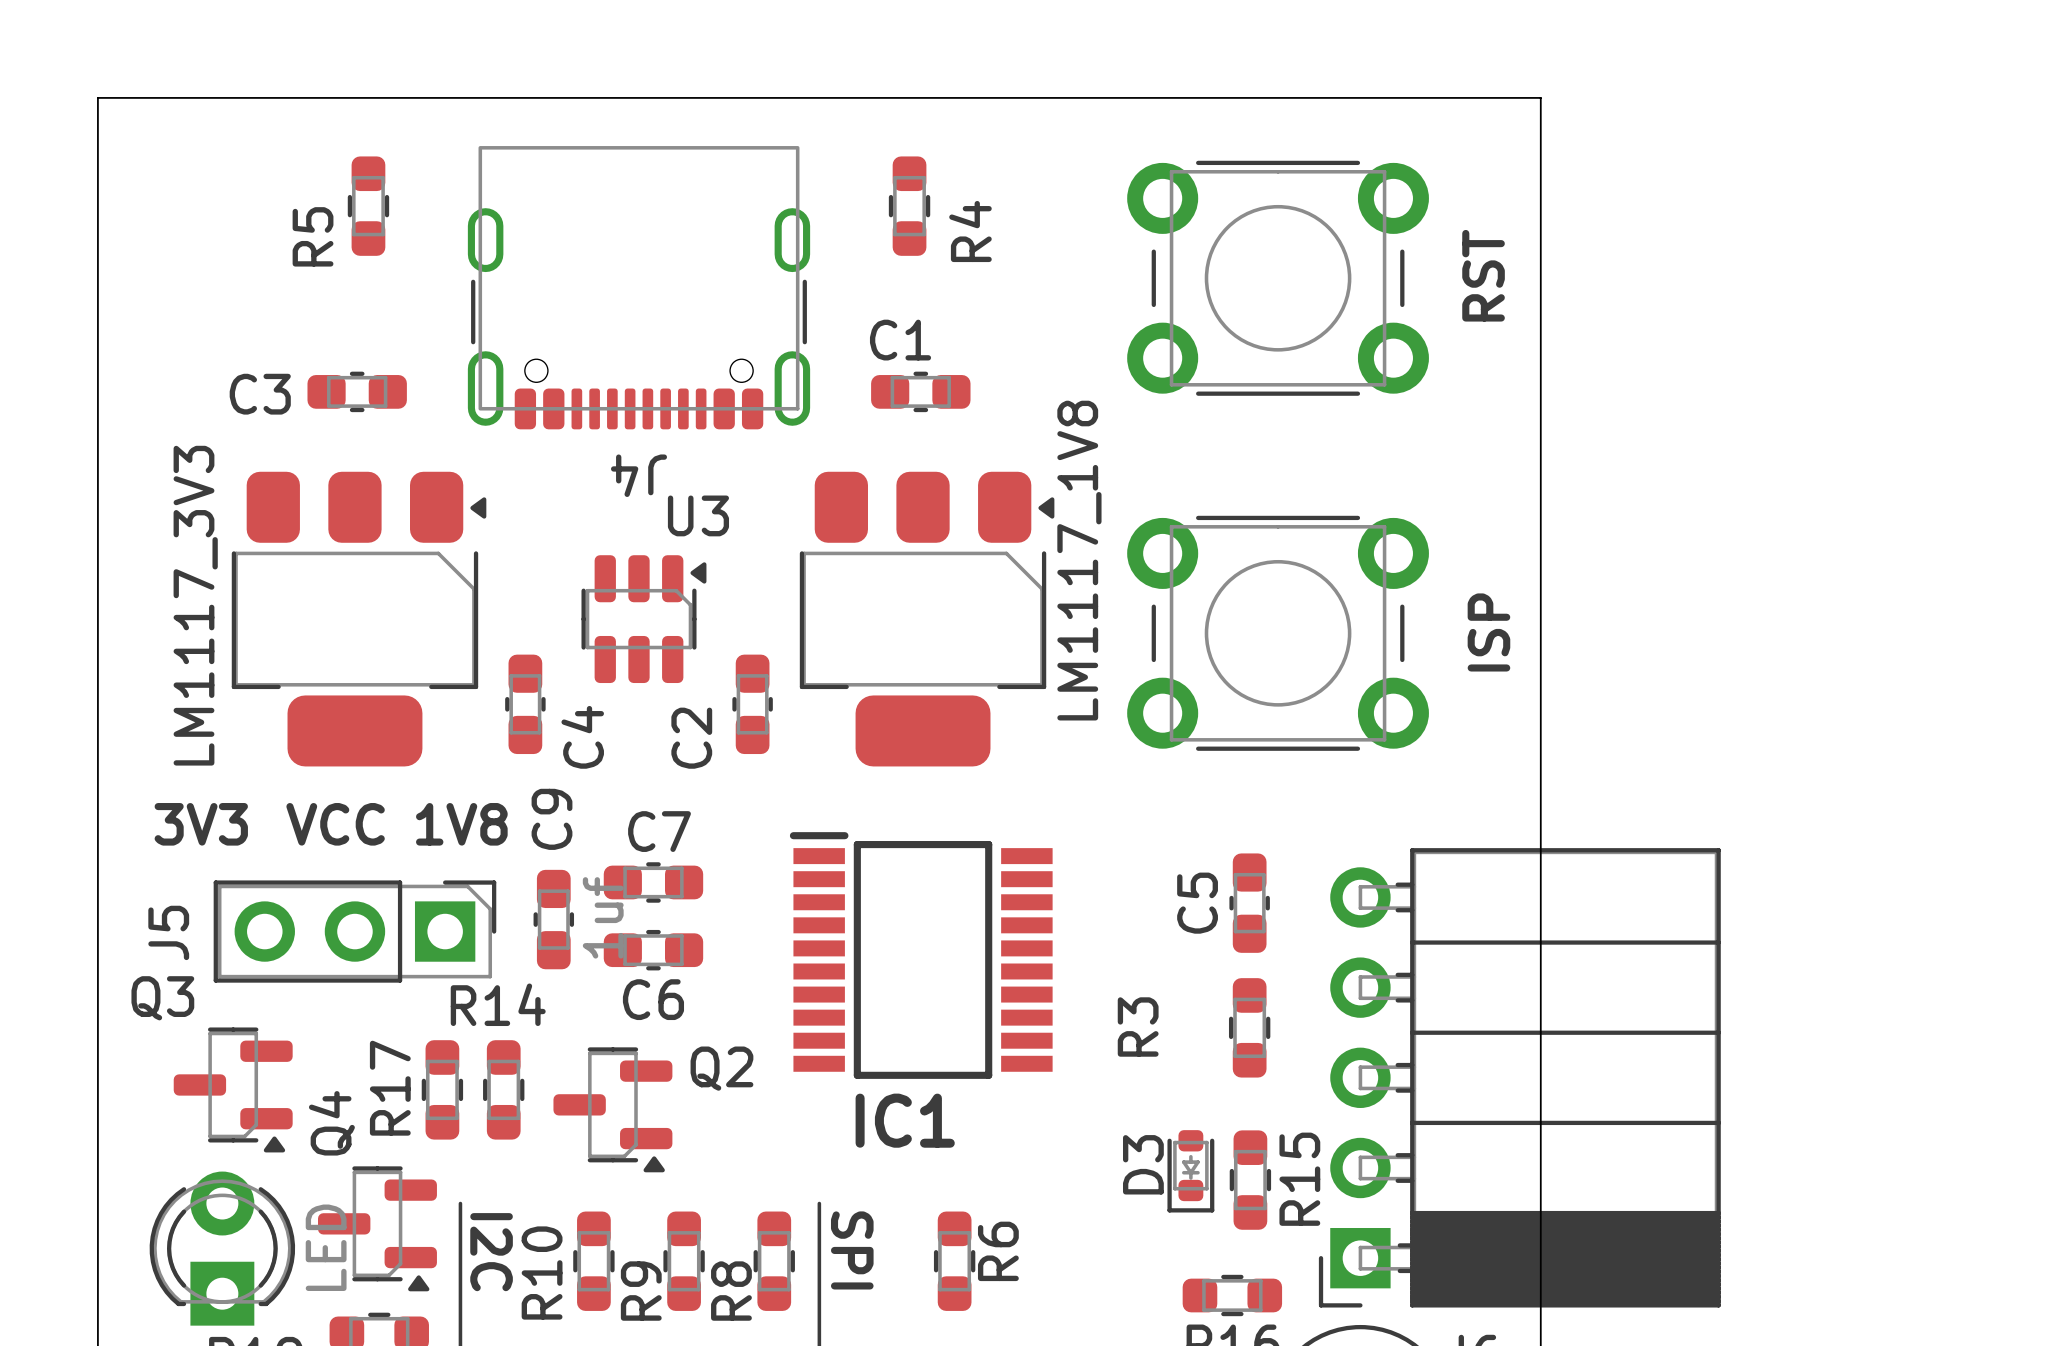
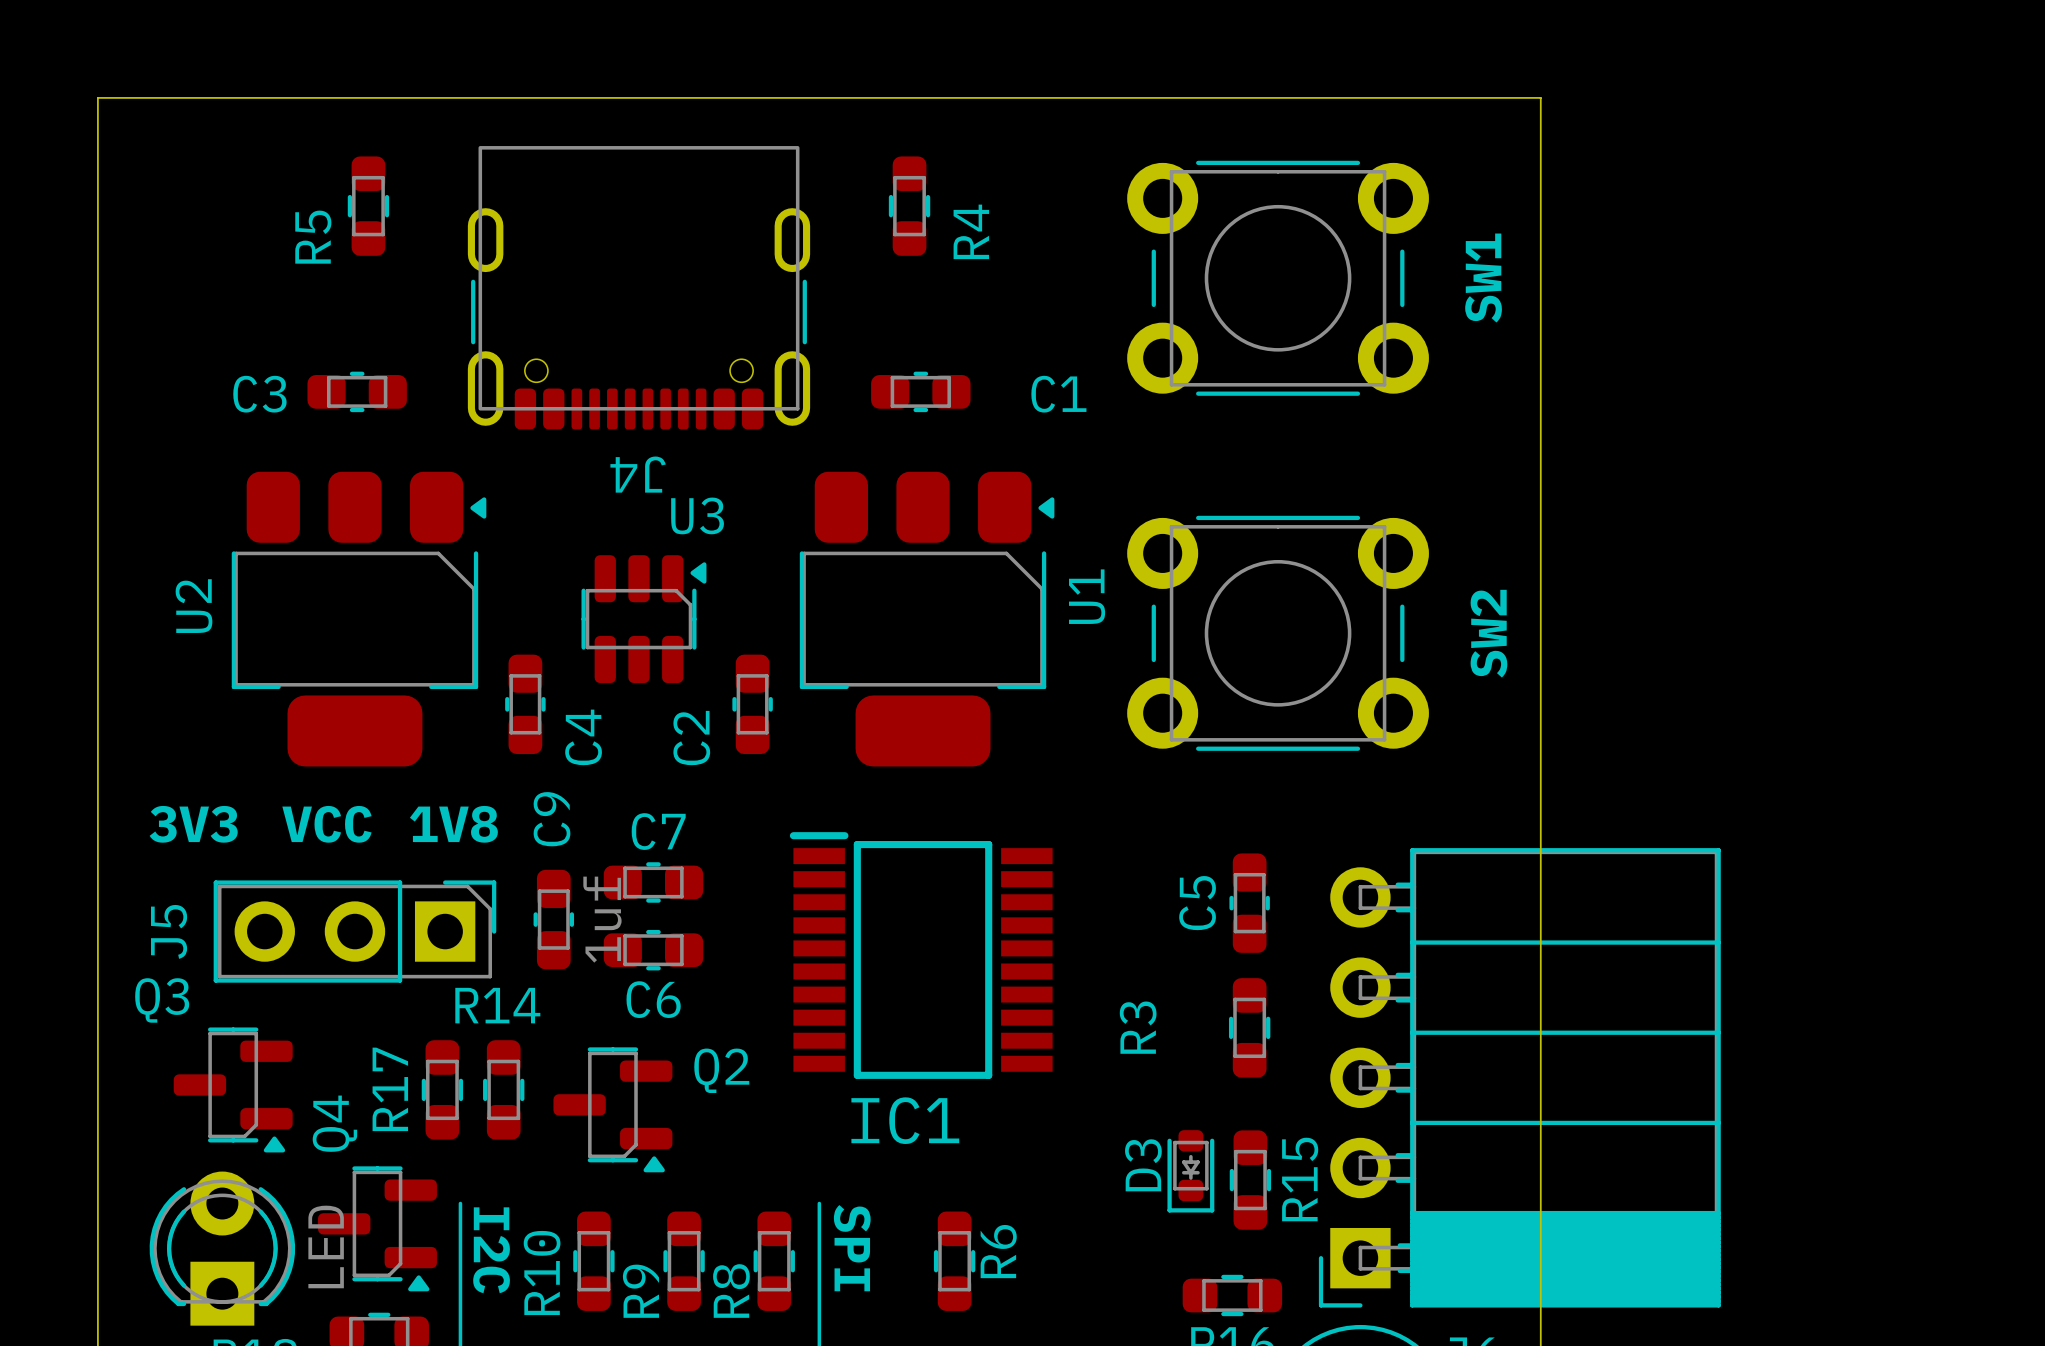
RST name: RST (1483, 275) -> SW1 (1483, 278)
C1 name position: C1 (900, 340) -> C1 (1058, 394)
LM1117_1V8 name: LM1117_1V8 (1079, 560) -> U1 (1087, 596)
LM1117_3V3 name: LM1117_3V3 (195, 605) -> U2 (193, 606)
ISP name: ISP (1488, 632) -> SW2 (1488, 633)

